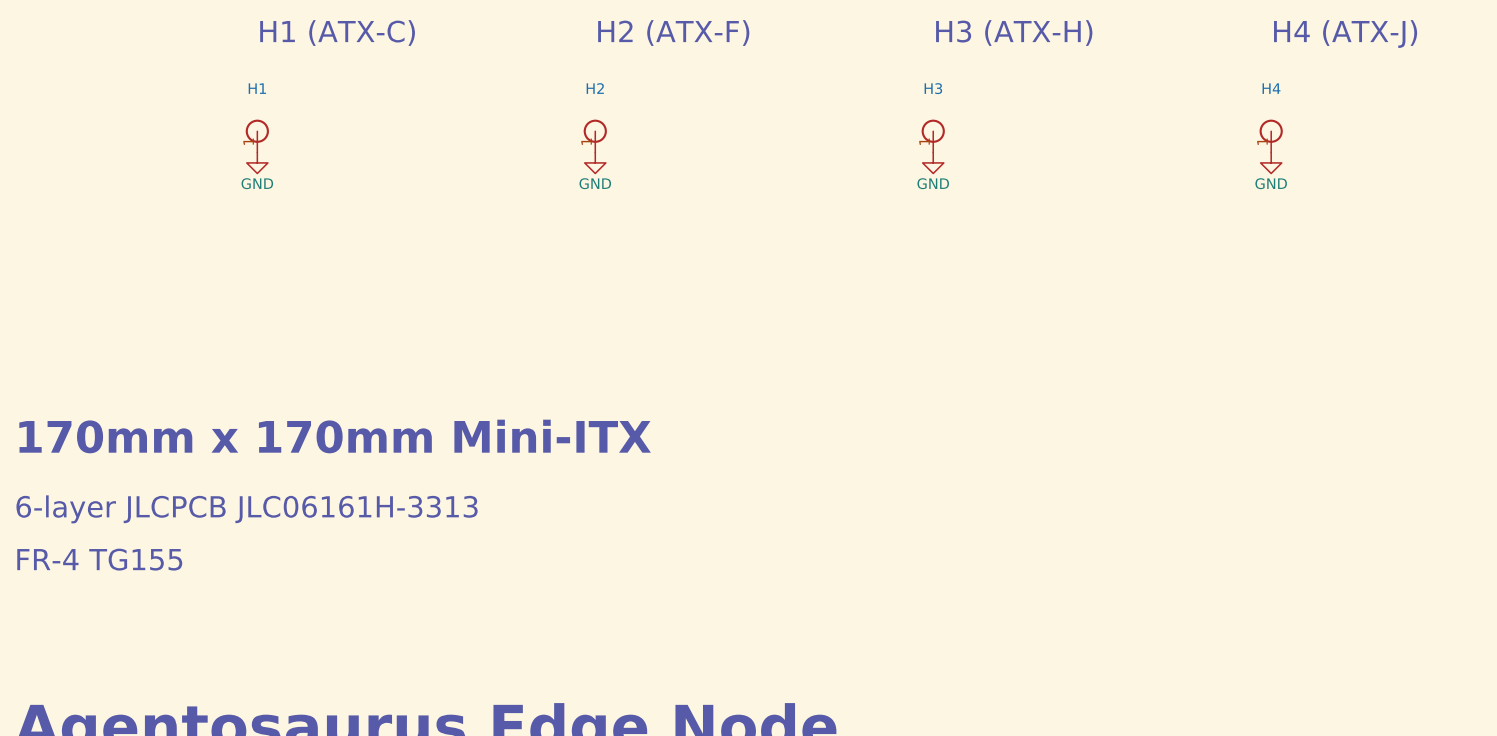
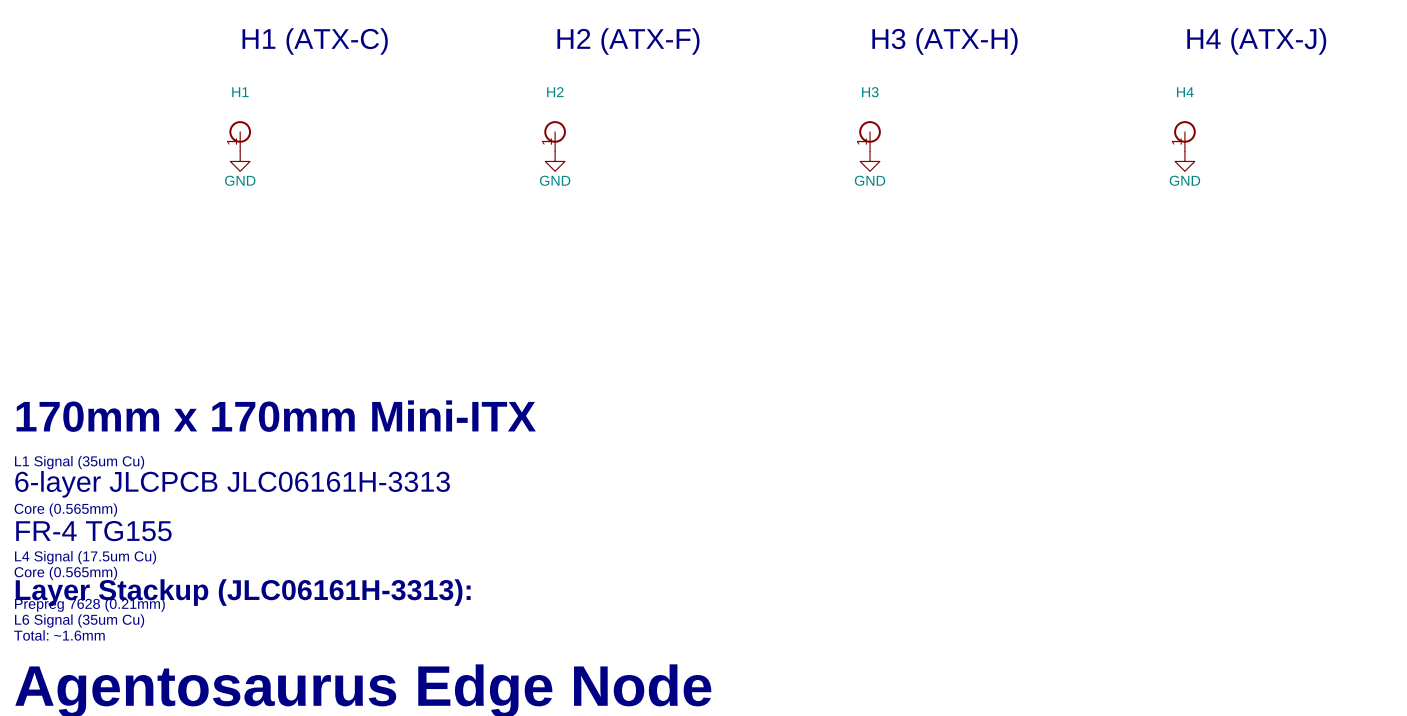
text: none -> L1 Signal (35um Cu) (79, 462)
text: none -> Core (0.565mm) (65, 510)
text: none -> L4 Signal (17.5um Cu) (85, 557)
text: none -> Core (0.565mm) (65, 573)
text: none -> Layer Stackup (JLC06161H-3313): (243, 592)
text: none -> Prepreg 7628 (0.21mm) (89, 605)
text: none -> L6 Signal (35um Cu) (79, 620)
text: none -> Total: ~1.6mm (59, 635)

